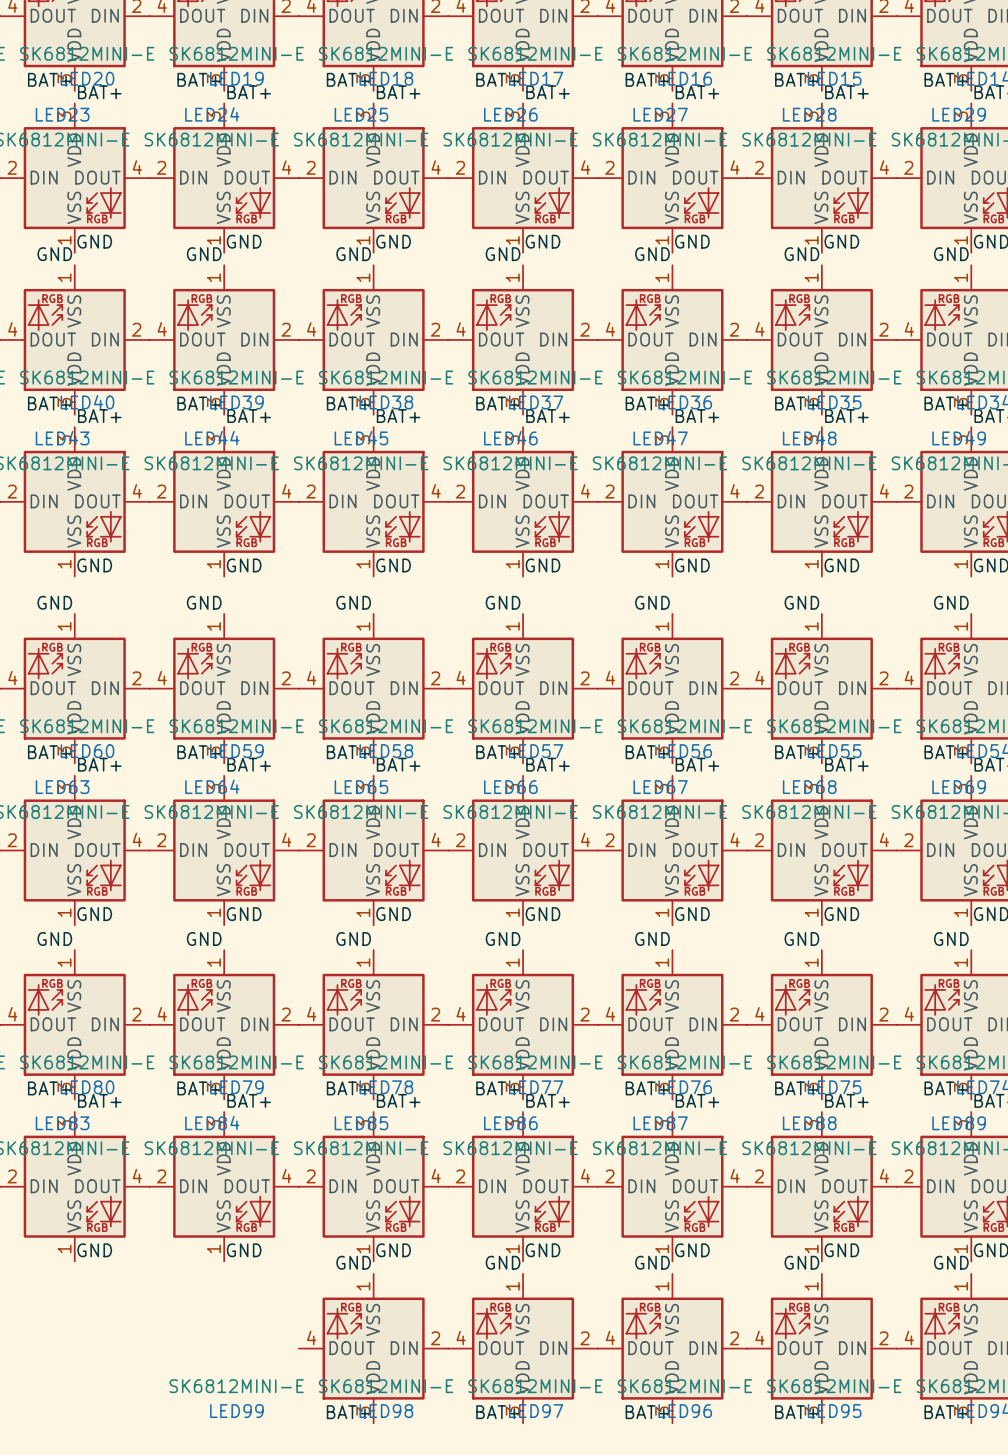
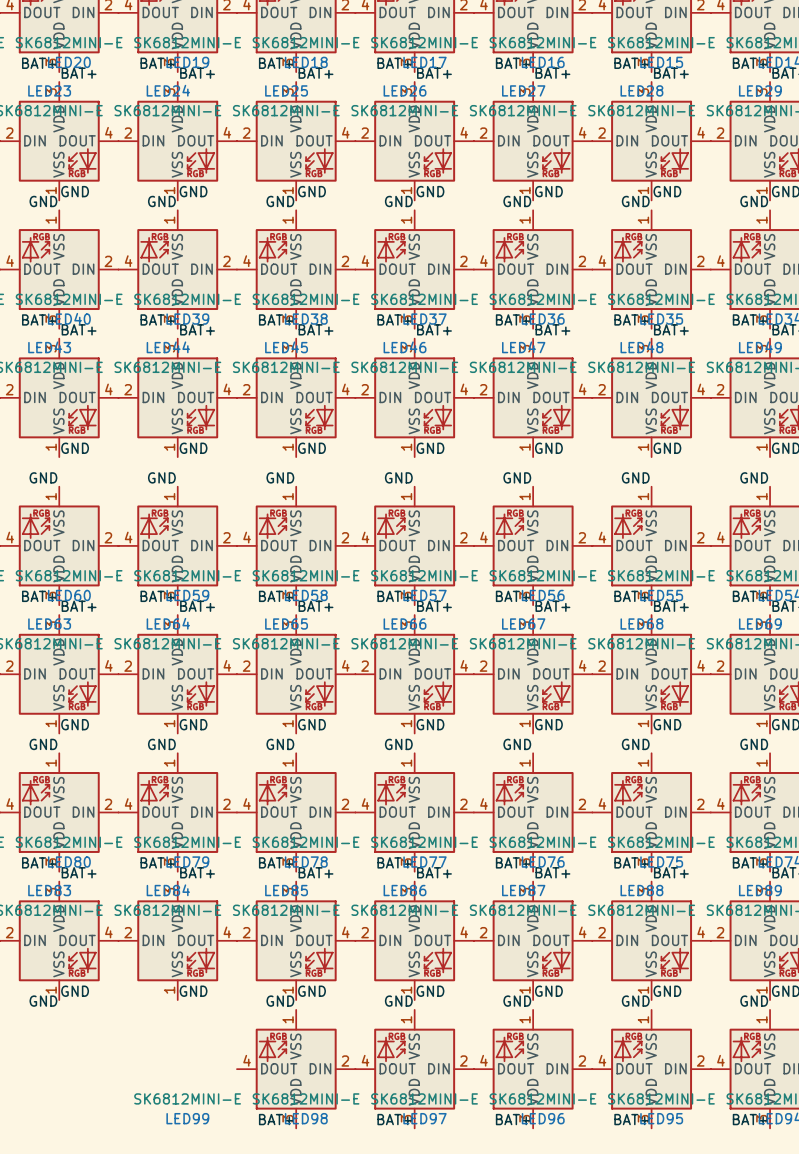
label: none -> GND (43, 1001)

